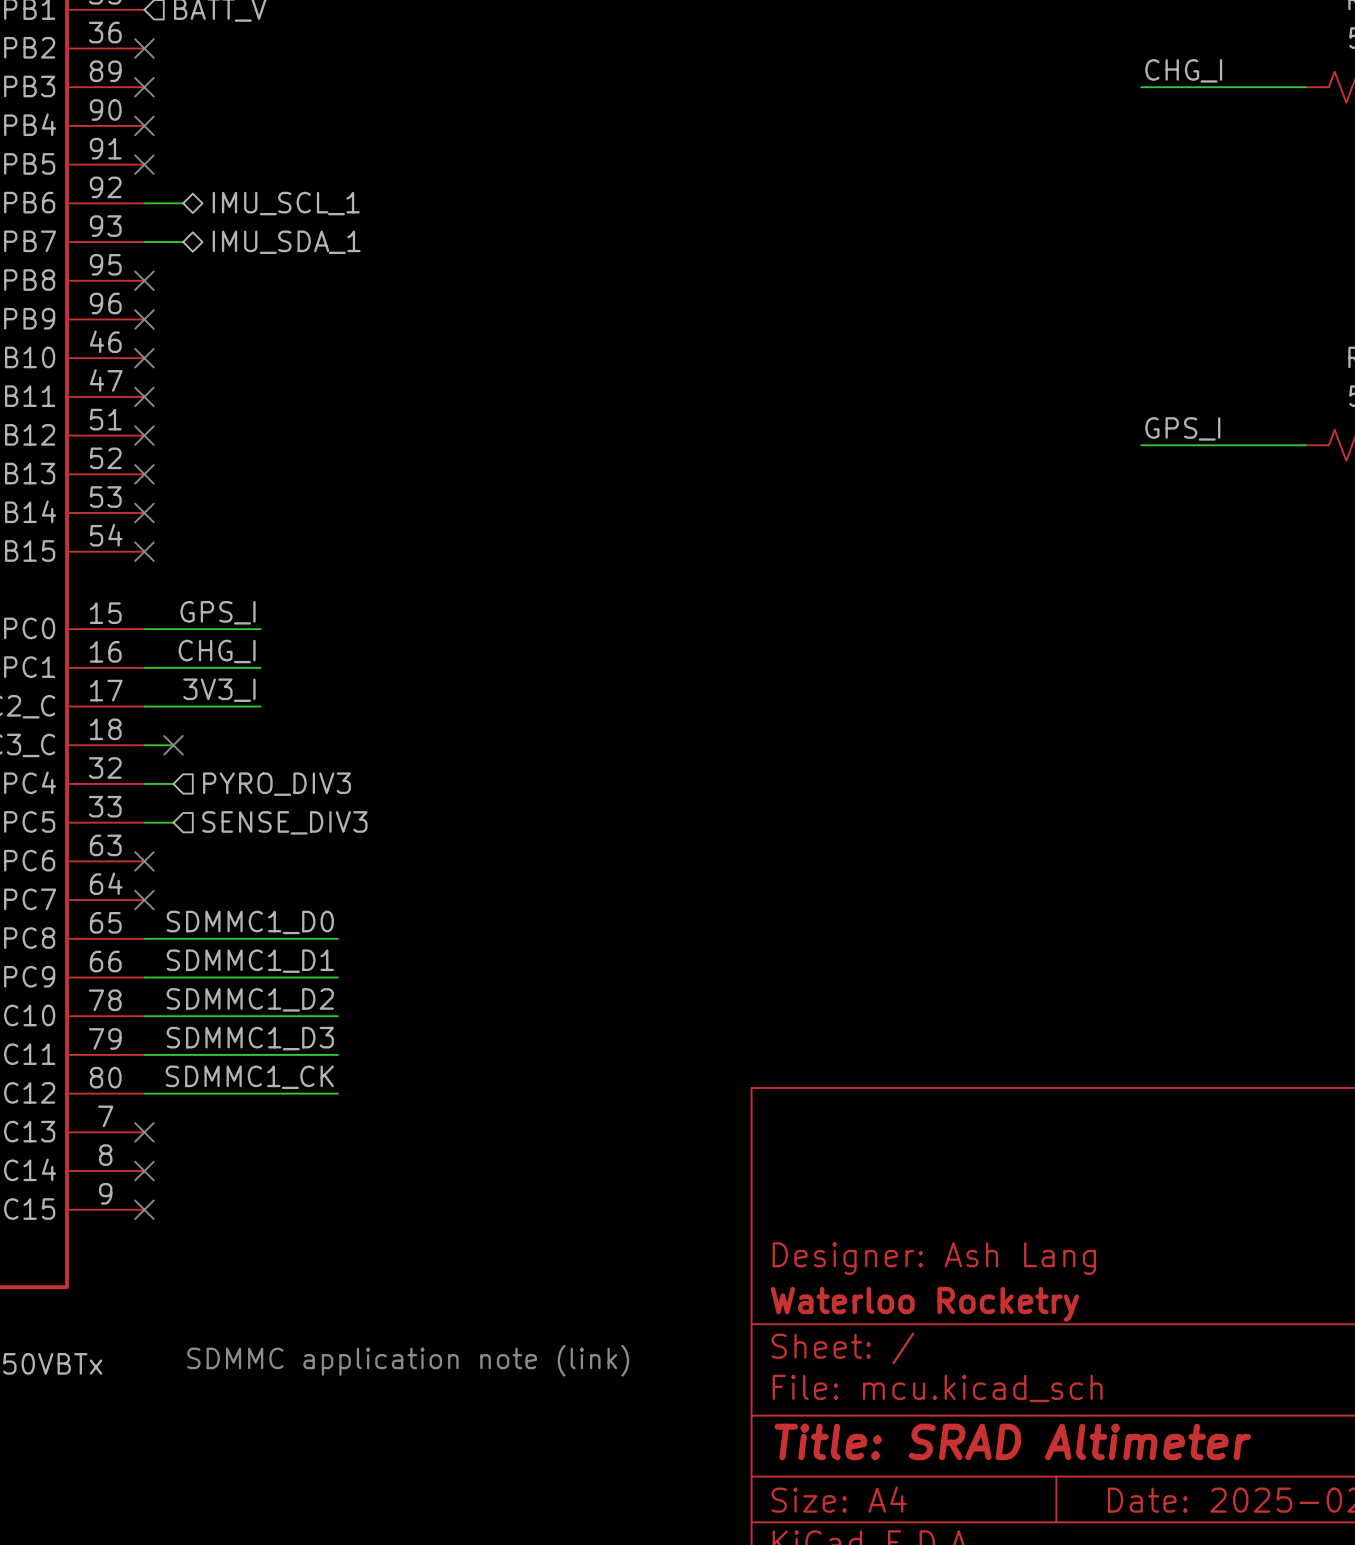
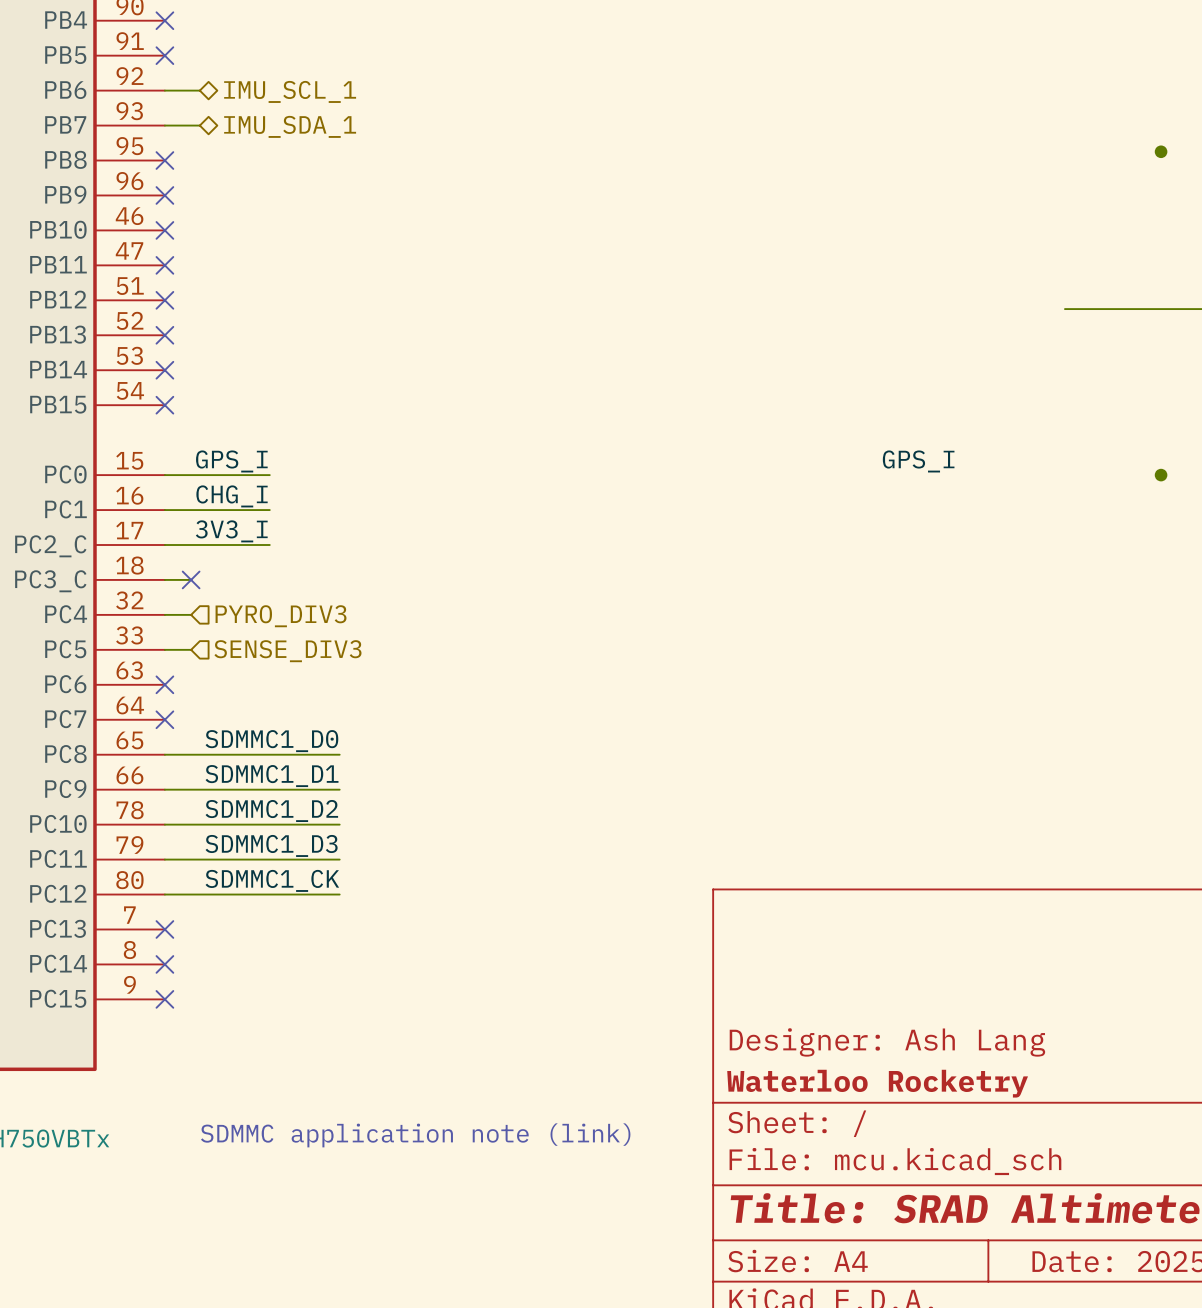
junction: none -> (1161, 151)
label position: GPS_I (1182, 428) -> GPS_I (918, 461)
junction: none -> (1161, 475)

